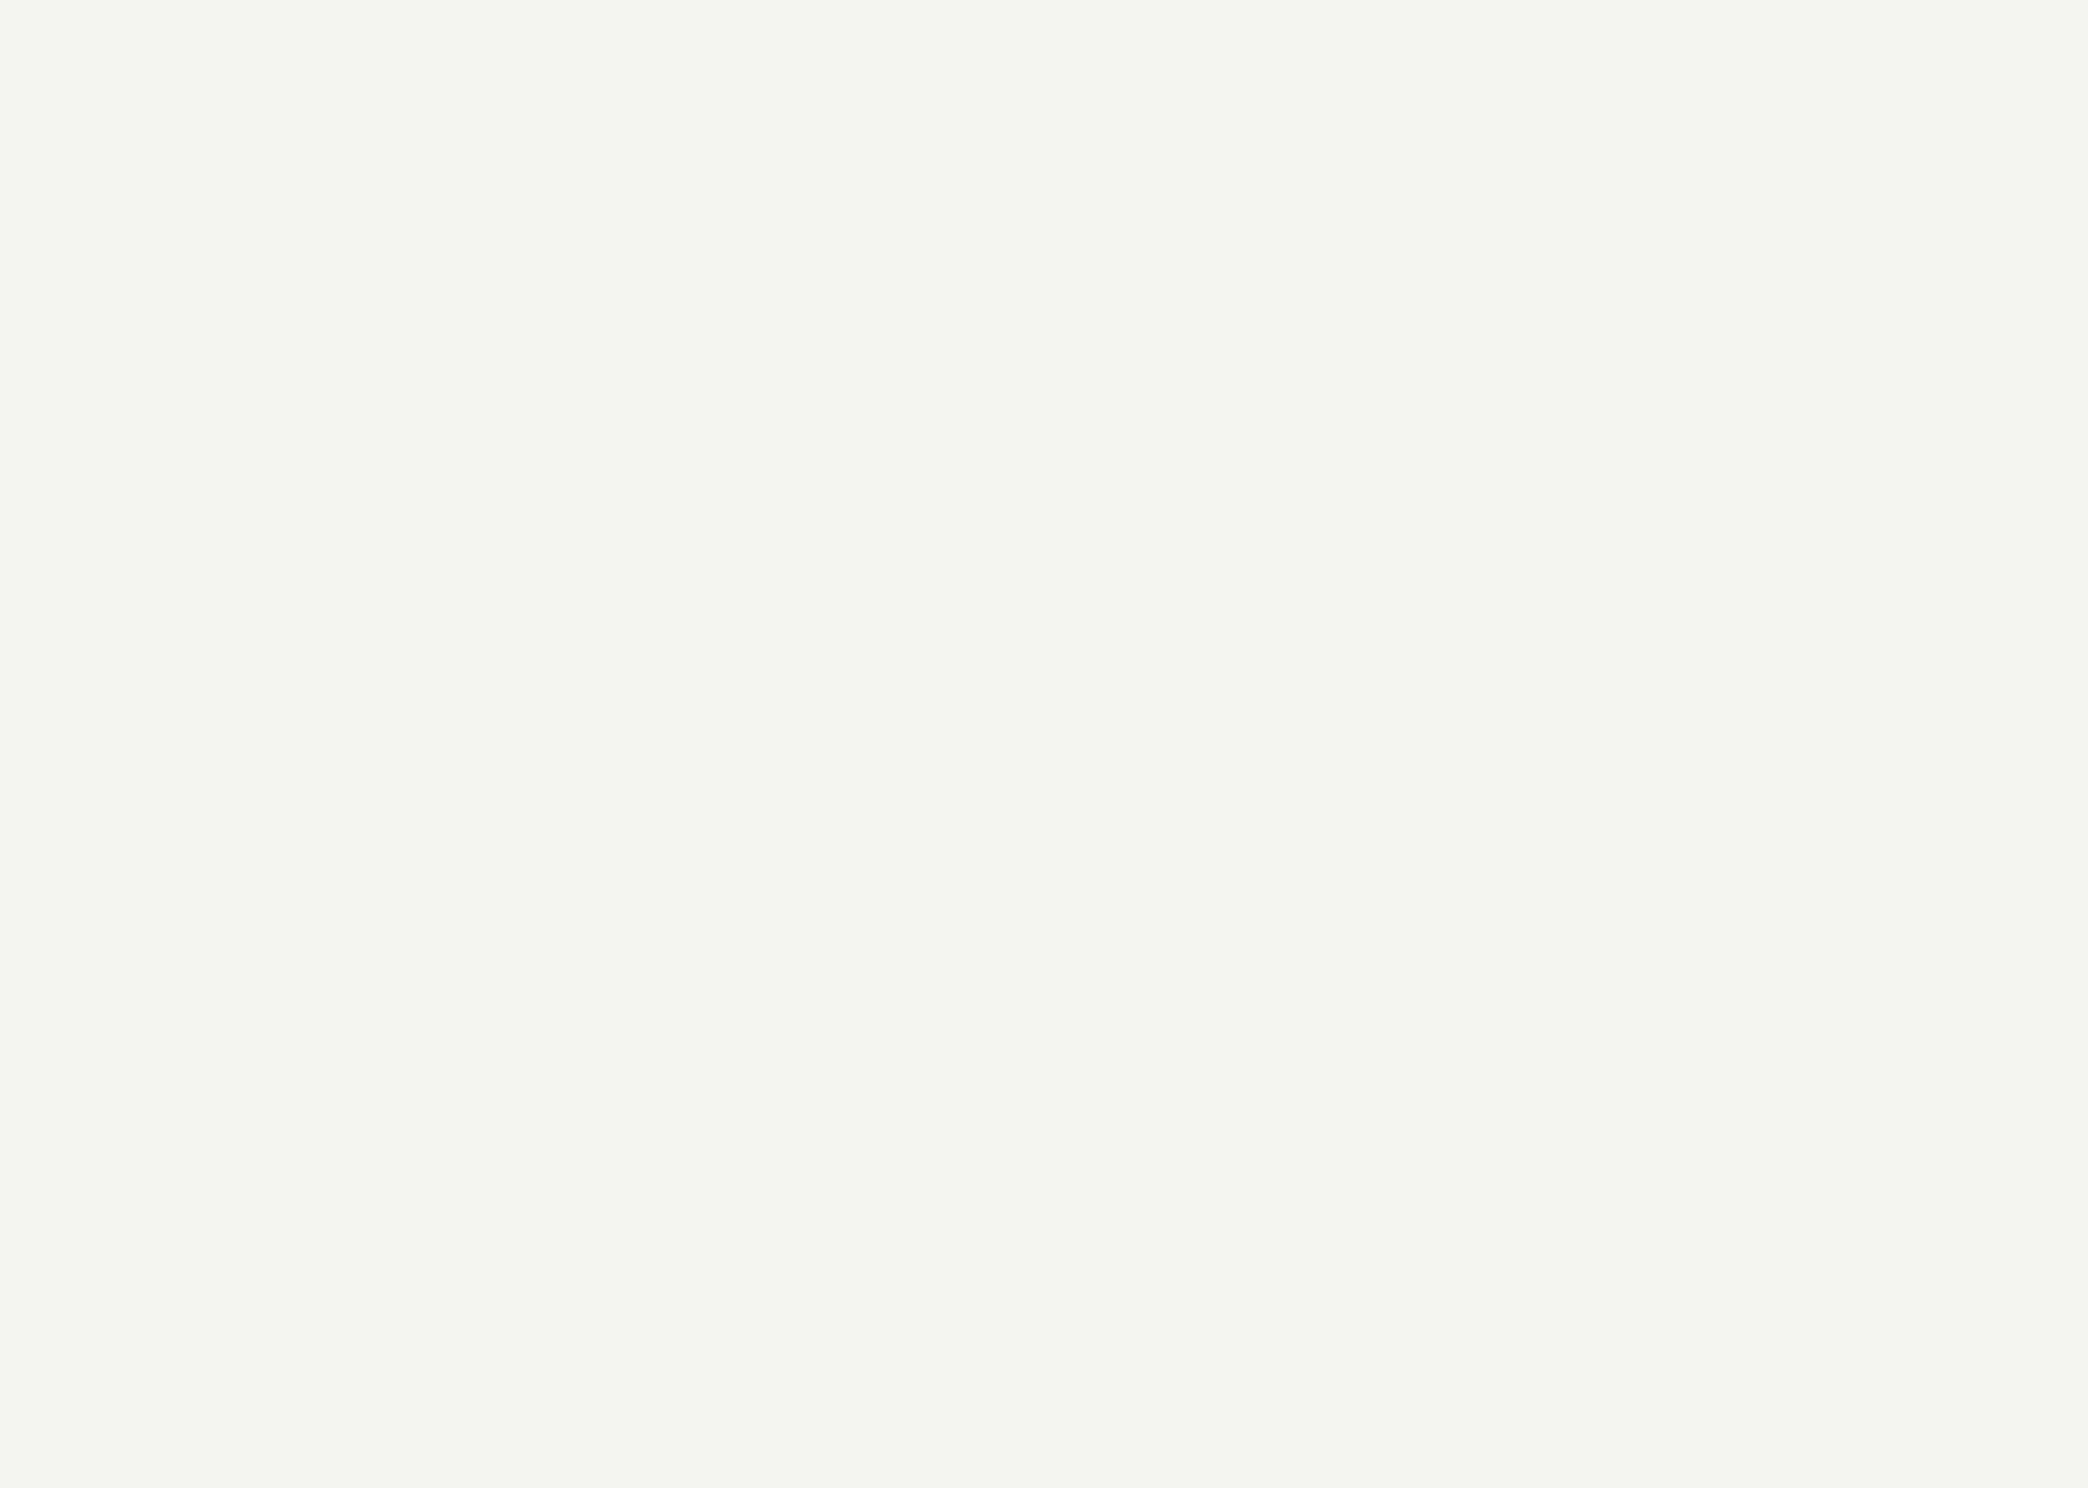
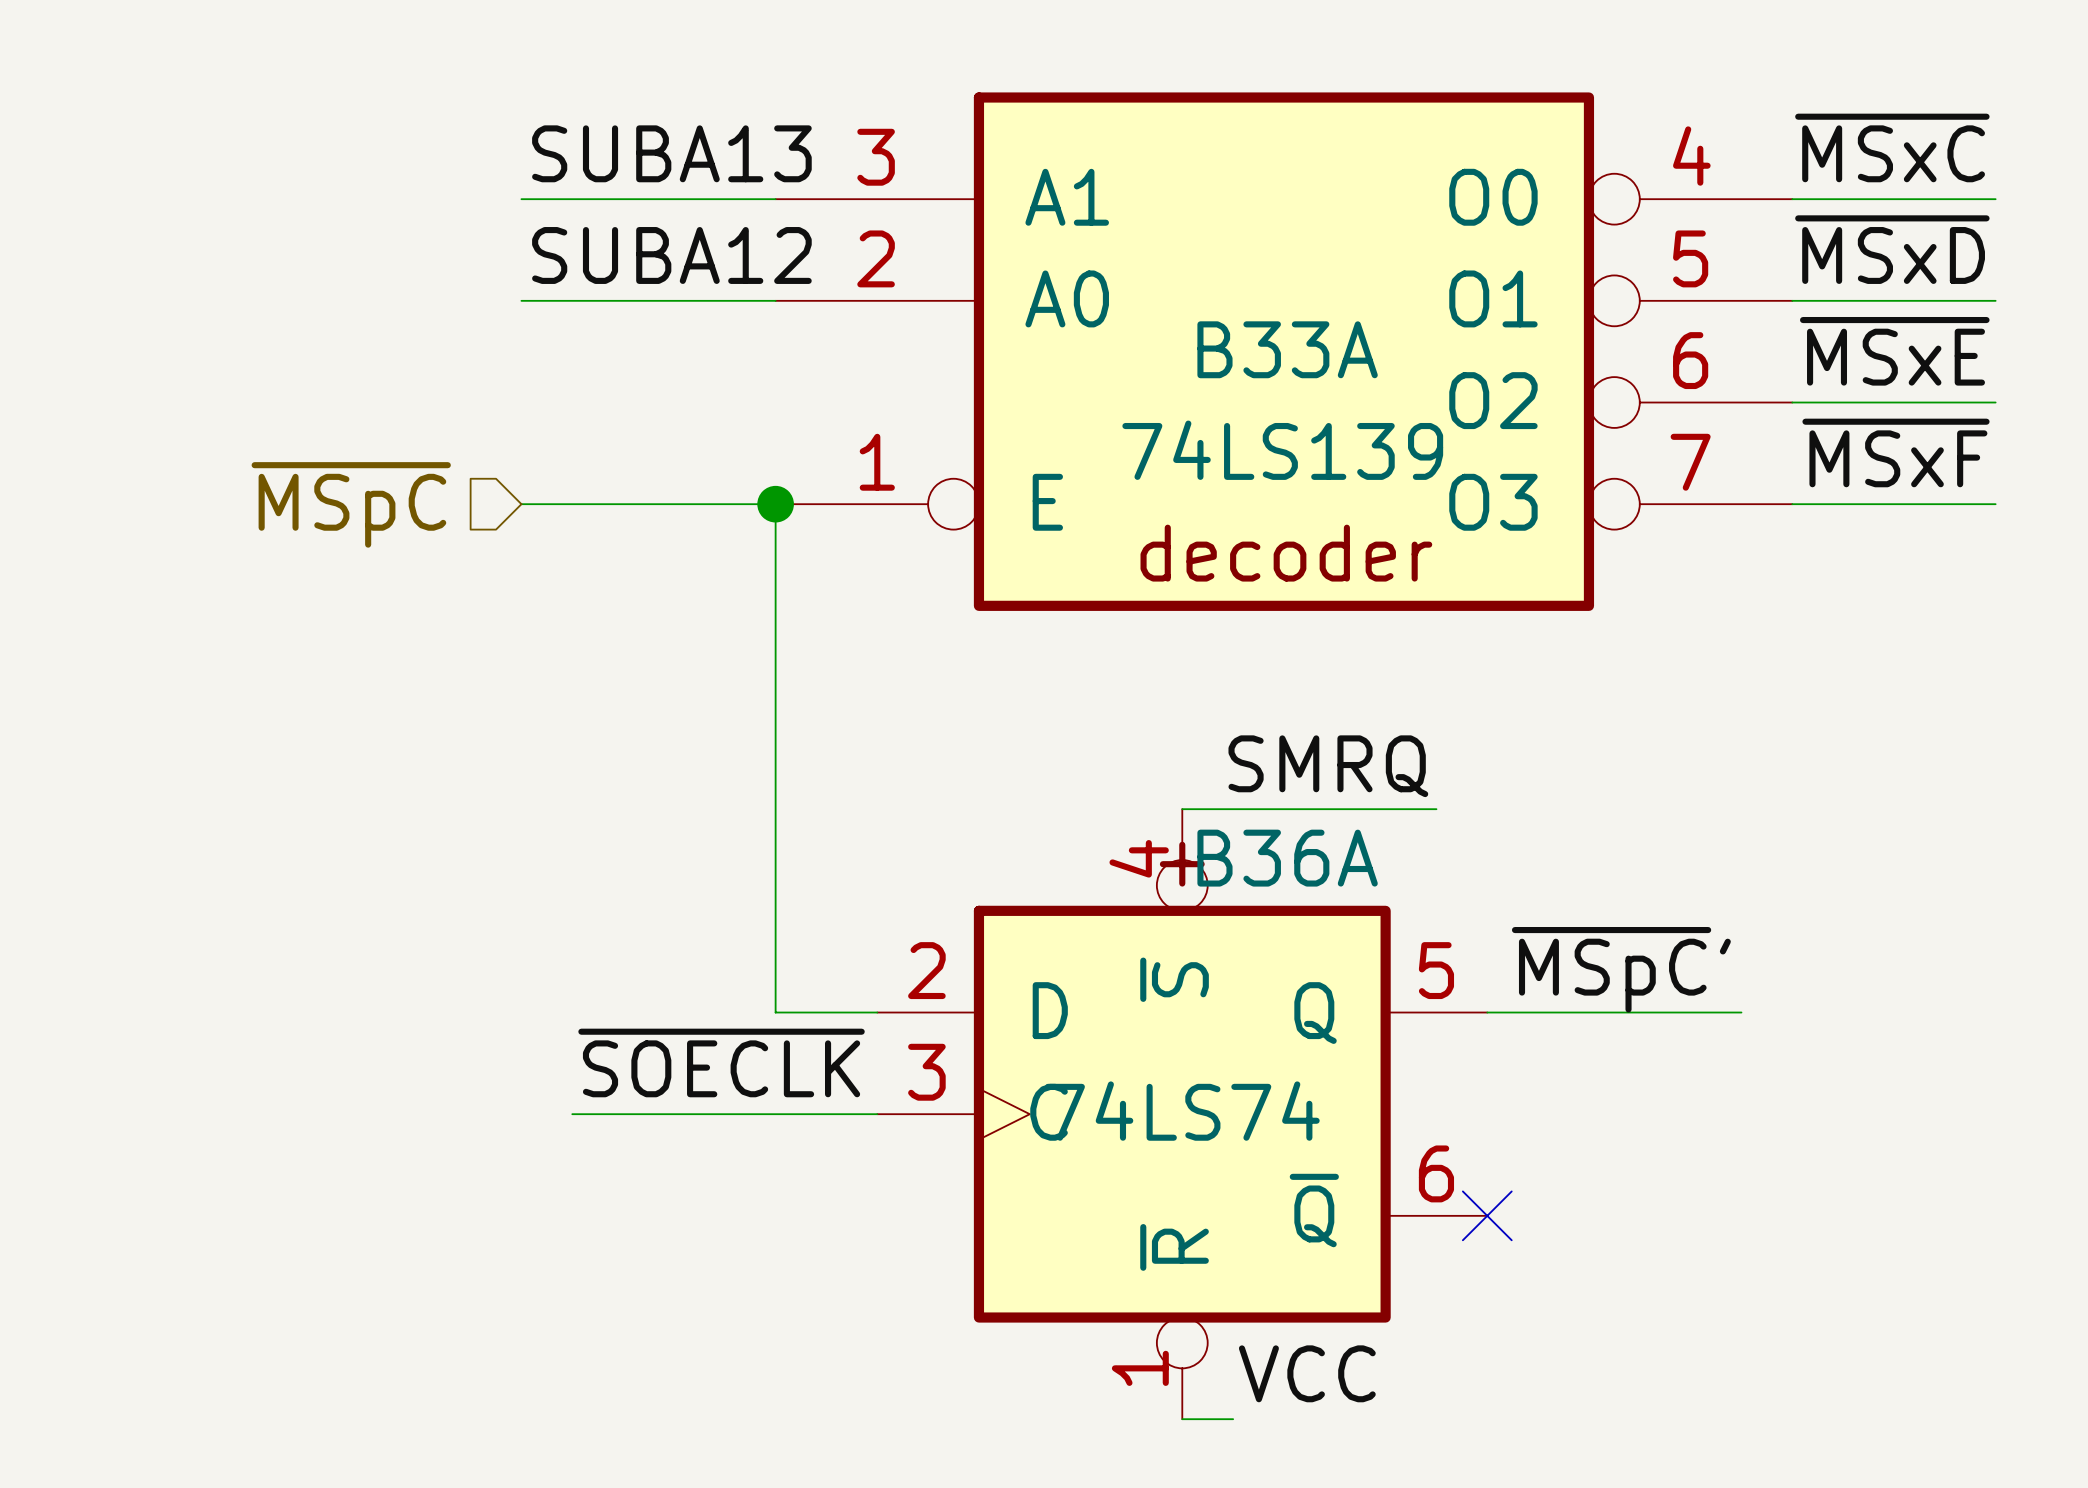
label: none -> ~{MSxC} (1892, 147)
label: none -> SUBA13 (671, 153)
wire: none -> (521, 199) (775, 199)
wire: none -> (1792, 199) (1995, 199)
label: none -> ~{MSxD} (1892, 249)
label: none -> SUBA12 (671, 255)
wire: none -> (521, 300) (775, 300)
wire: none -> (1792, 300) (1995, 300)
B33A: none -> 74LS139 (1283, 351)
label: none -> ~{MSxE} (1894, 351)
wire: none -> (1792, 402) (1995, 402)
label: none -> ~{MSxF} (1896, 452)
hierarchical label: none -> ~{MSpC} (351, 504)
wire: none -> (521, 504) (775, 504) (775, 1012) (877, 1012)
junction: none -> (775, 504)
wire: none -> (1792, 504) (1995, 504)
label: none -> SMRQ (1328, 766)
wire: none -> (1182, 809) (1436, 809)
label: none -> ~{MSpC}' (1621, 969)
wire: none -> (1487, 1012) (1741, 1012)
label: none -> ~{SOECLK} (721, 1062)
wire: none -> (572, 1114) (877, 1114)
B36A: none -> 74LS74 (1182, 1114)
no-connect mark: none -> (1487, 1215)
label: none -> VCC (1307, 1373)
wire: none -> (1182, 1419) (1233, 1419)

